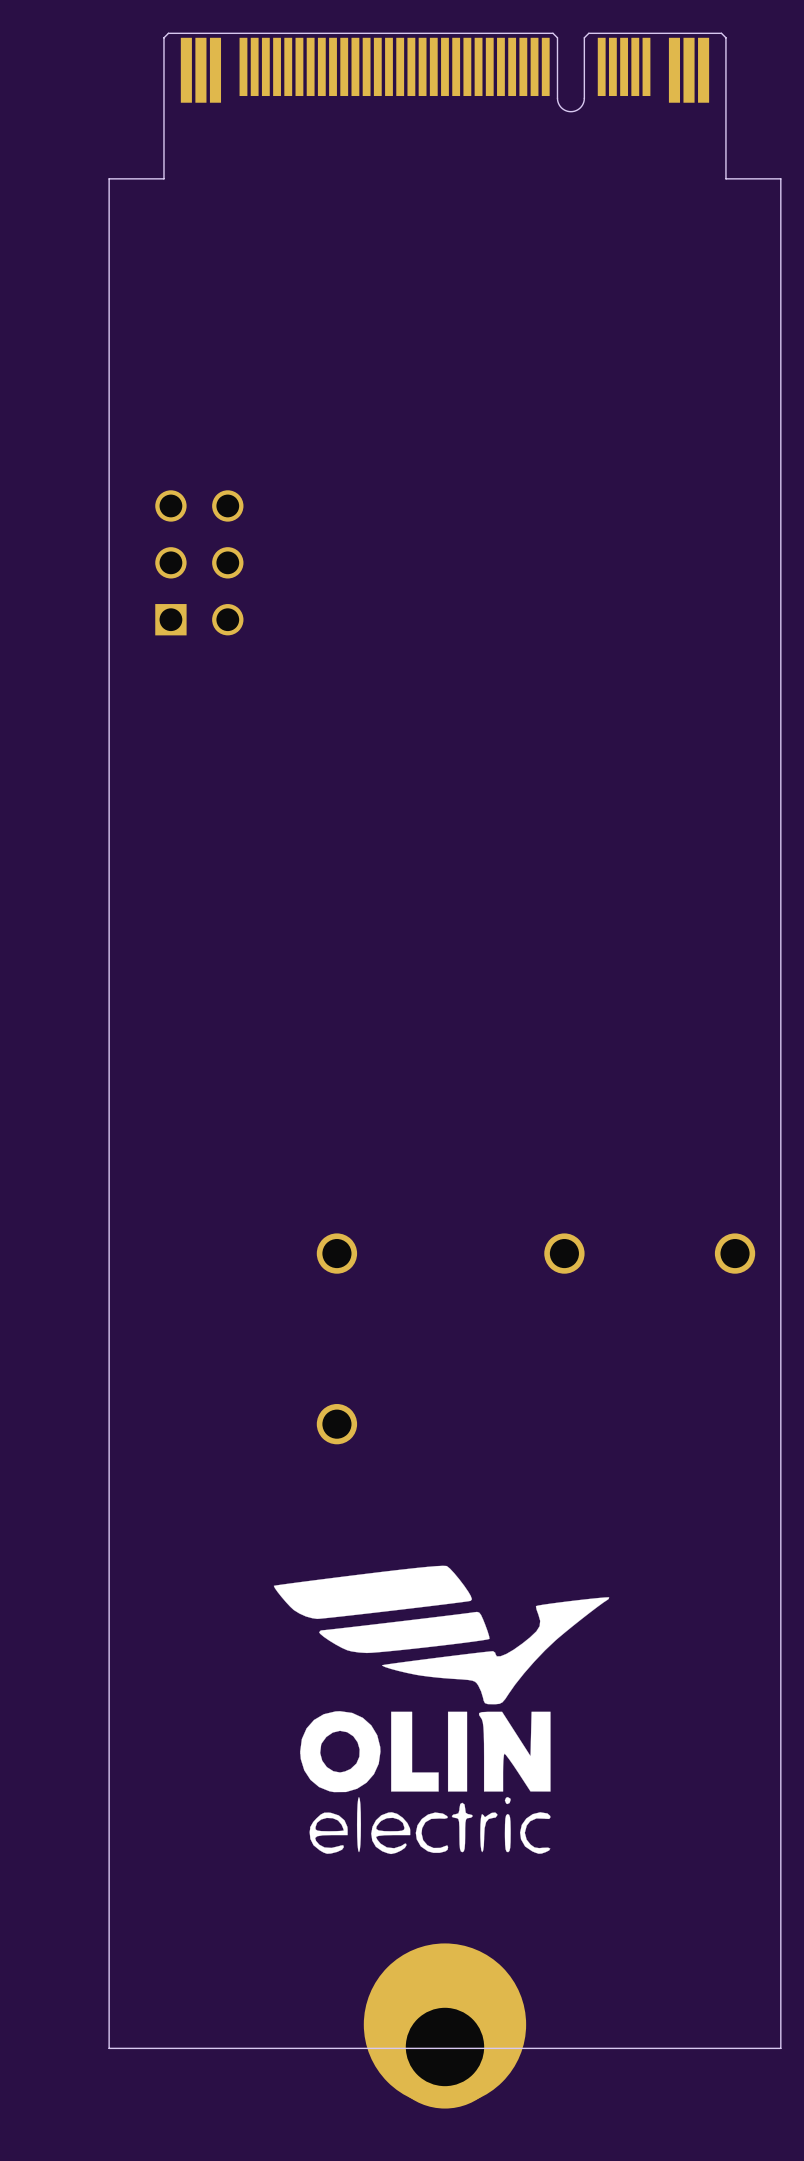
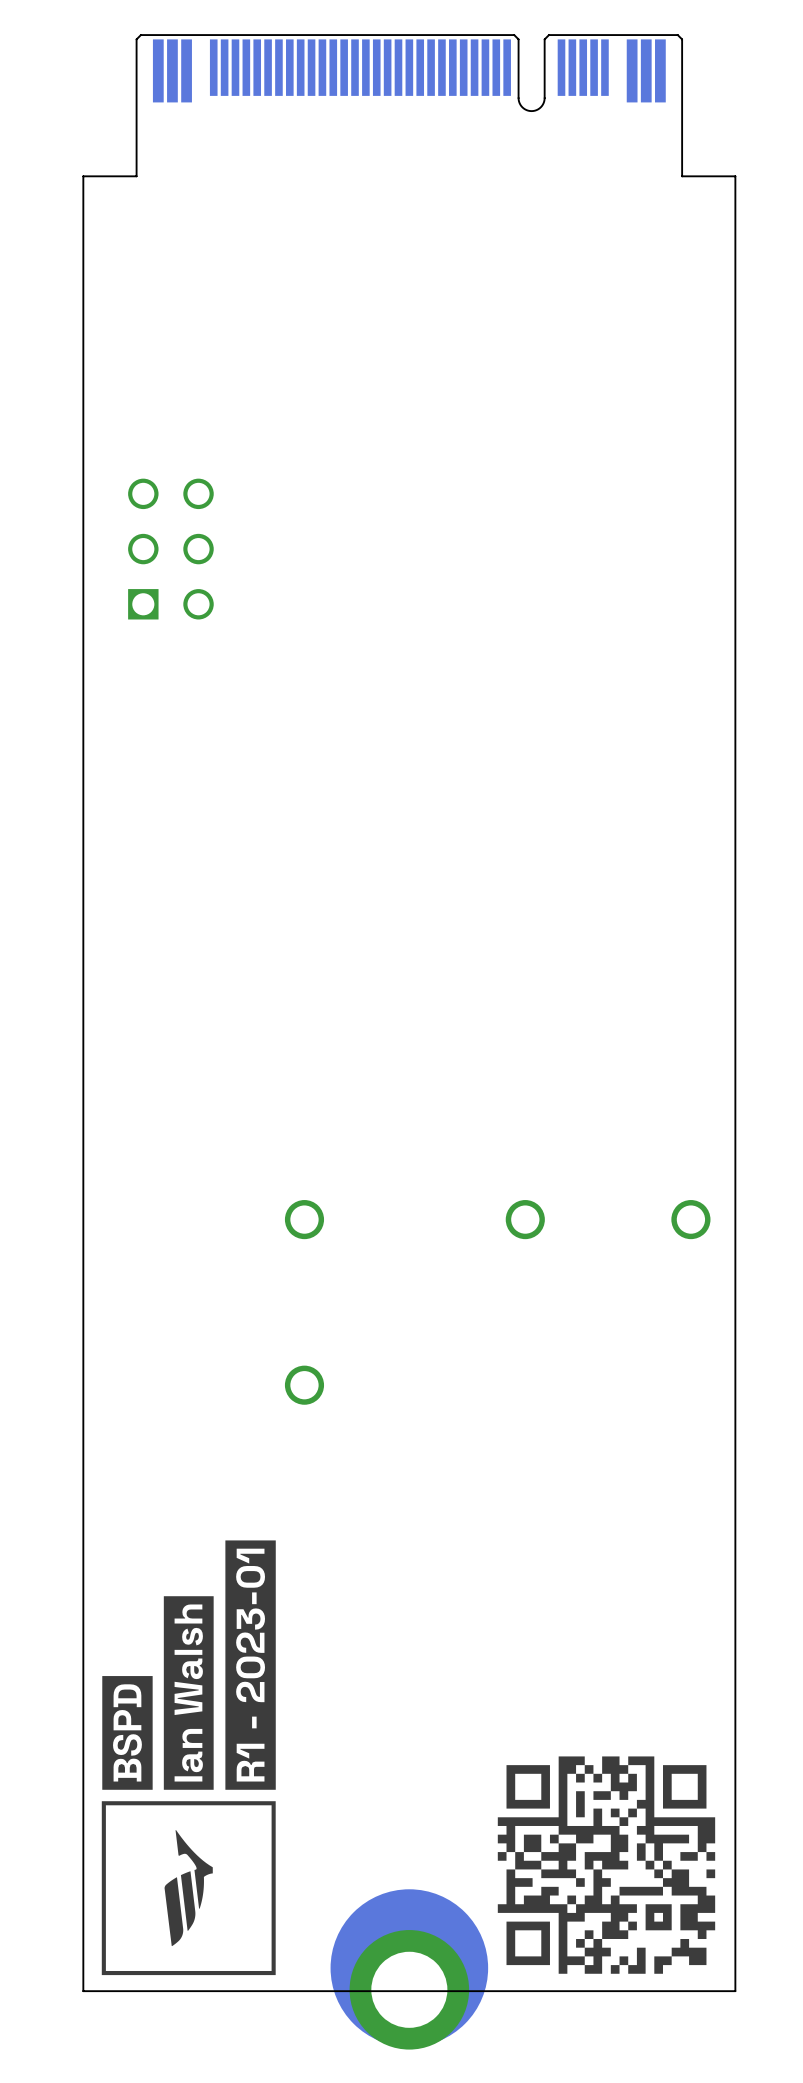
drawing: [273, 1565, 610, 1855] -> none
drawing: none -> [101, 1540, 276, 1976]
drawing: none -> [497, 1756, 716, 1974]

